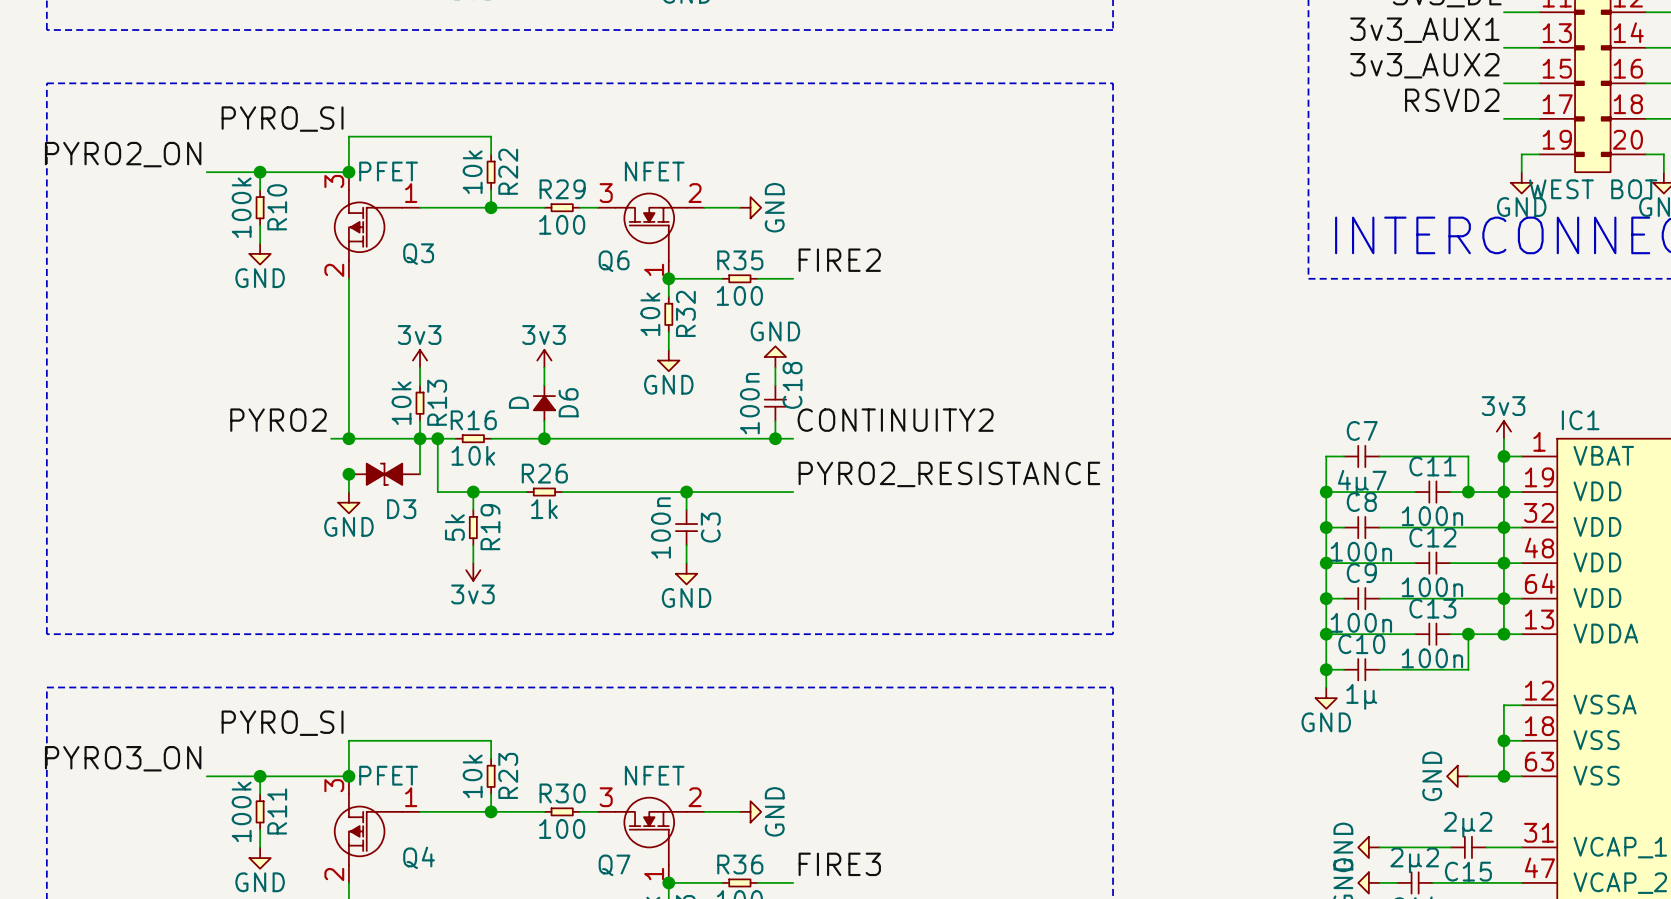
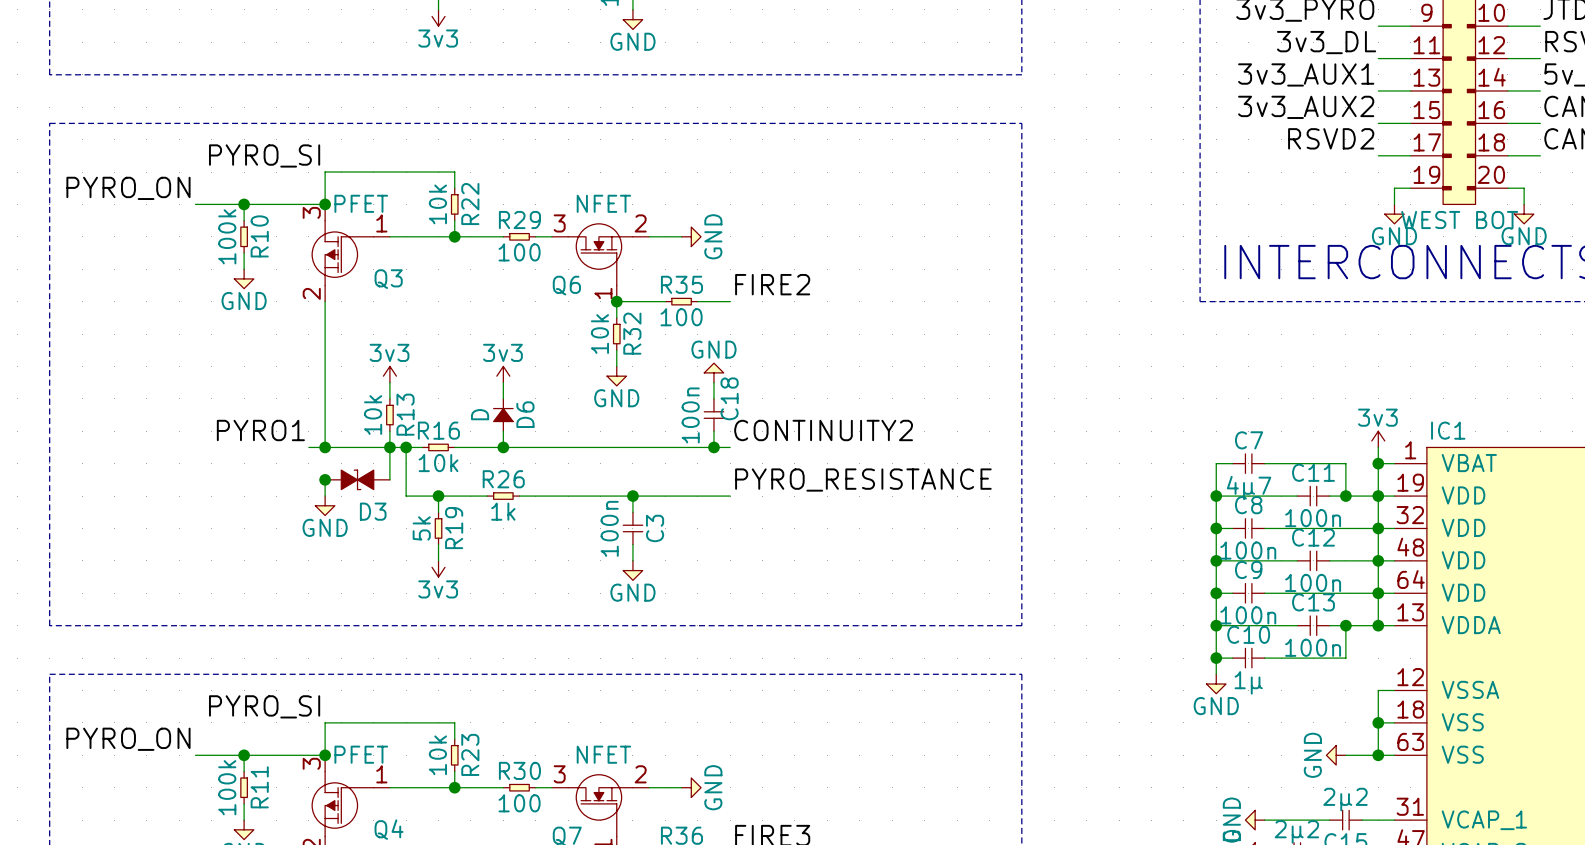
label: PYRO2_ON (123, 154) -> PYRO_ON (128, 188)
label: PYRO2 (278, 420) -> PYRO1 (260, 430)
label: PYRO2_RESISTANCE (949, 474) -> PYRO_RESISTANCE (863, 480)
label: PYRO3_ON (123, 758) -> PYRO_ON (128, 739)

